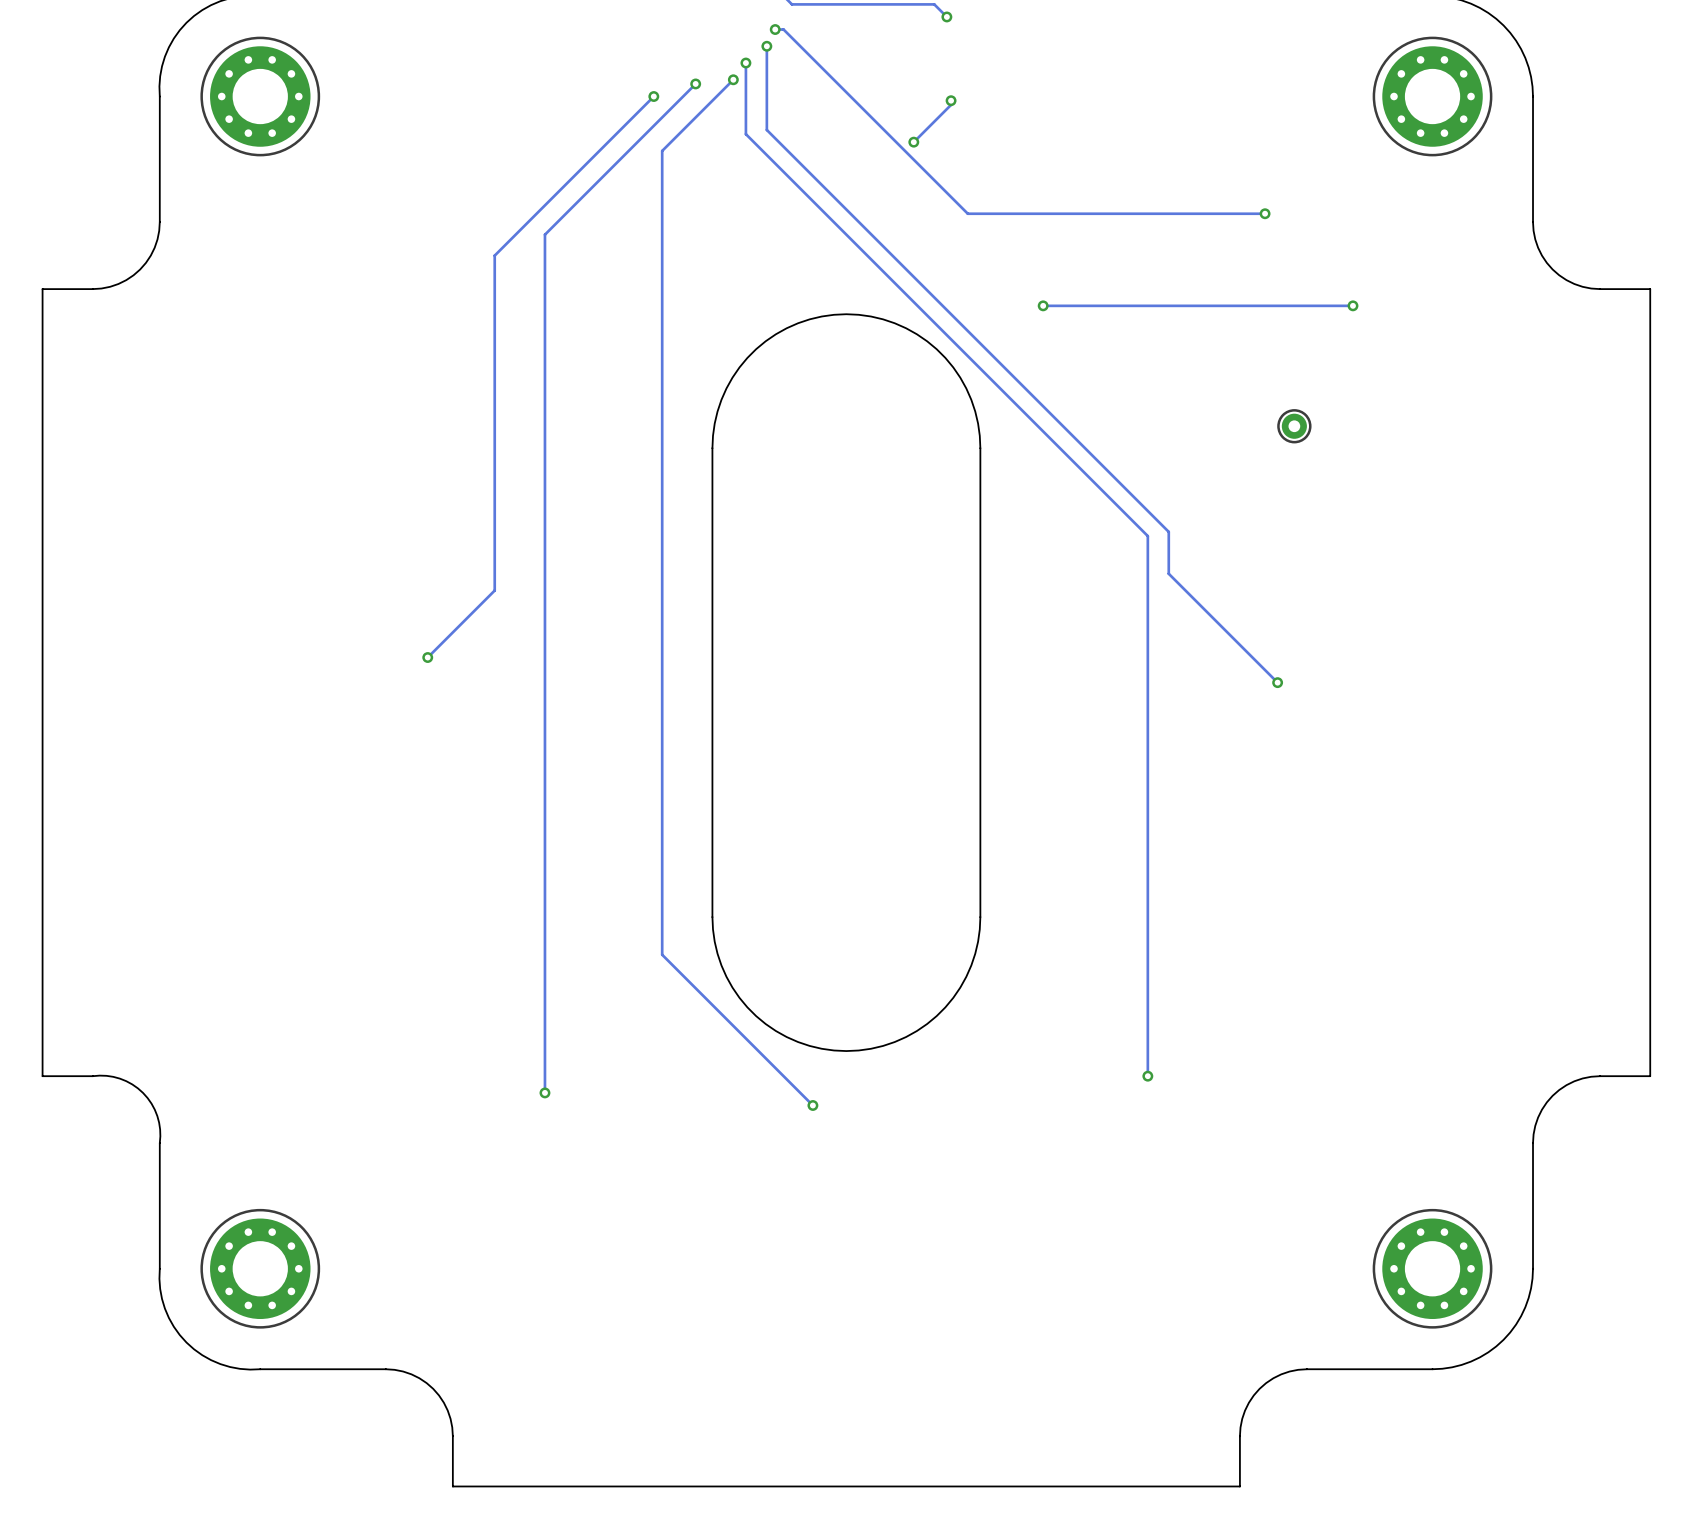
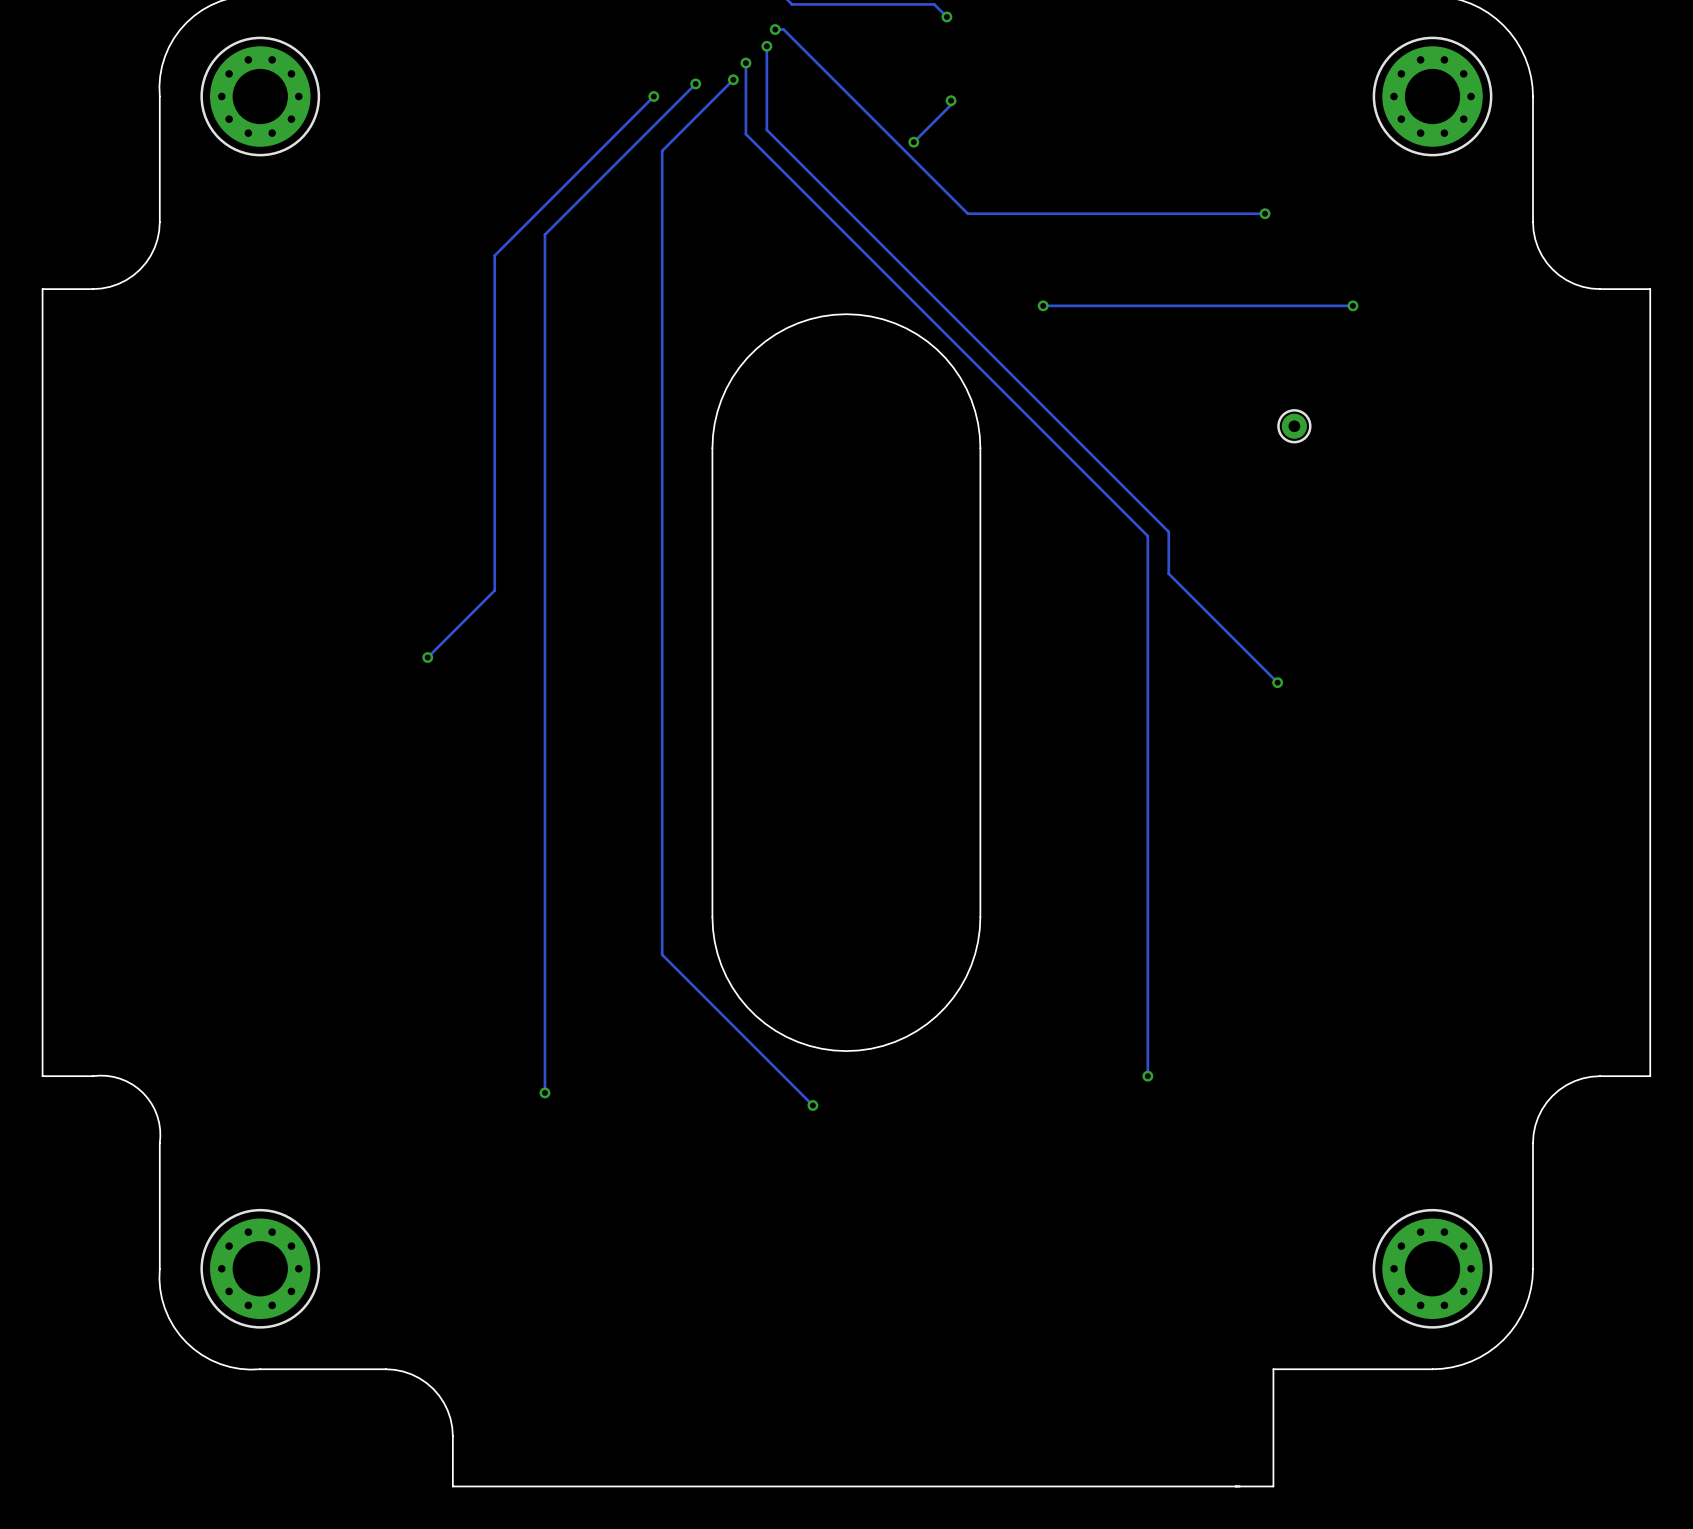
board edge: (1306, 1369) (1289, 1371) (1273, 1378) (1259, 1388) (1248, 1402) (1240, 1427) (1239, 1486) -> (1306, 1369) (1273, 1369) (1273, 1486) (1239, 1486)

